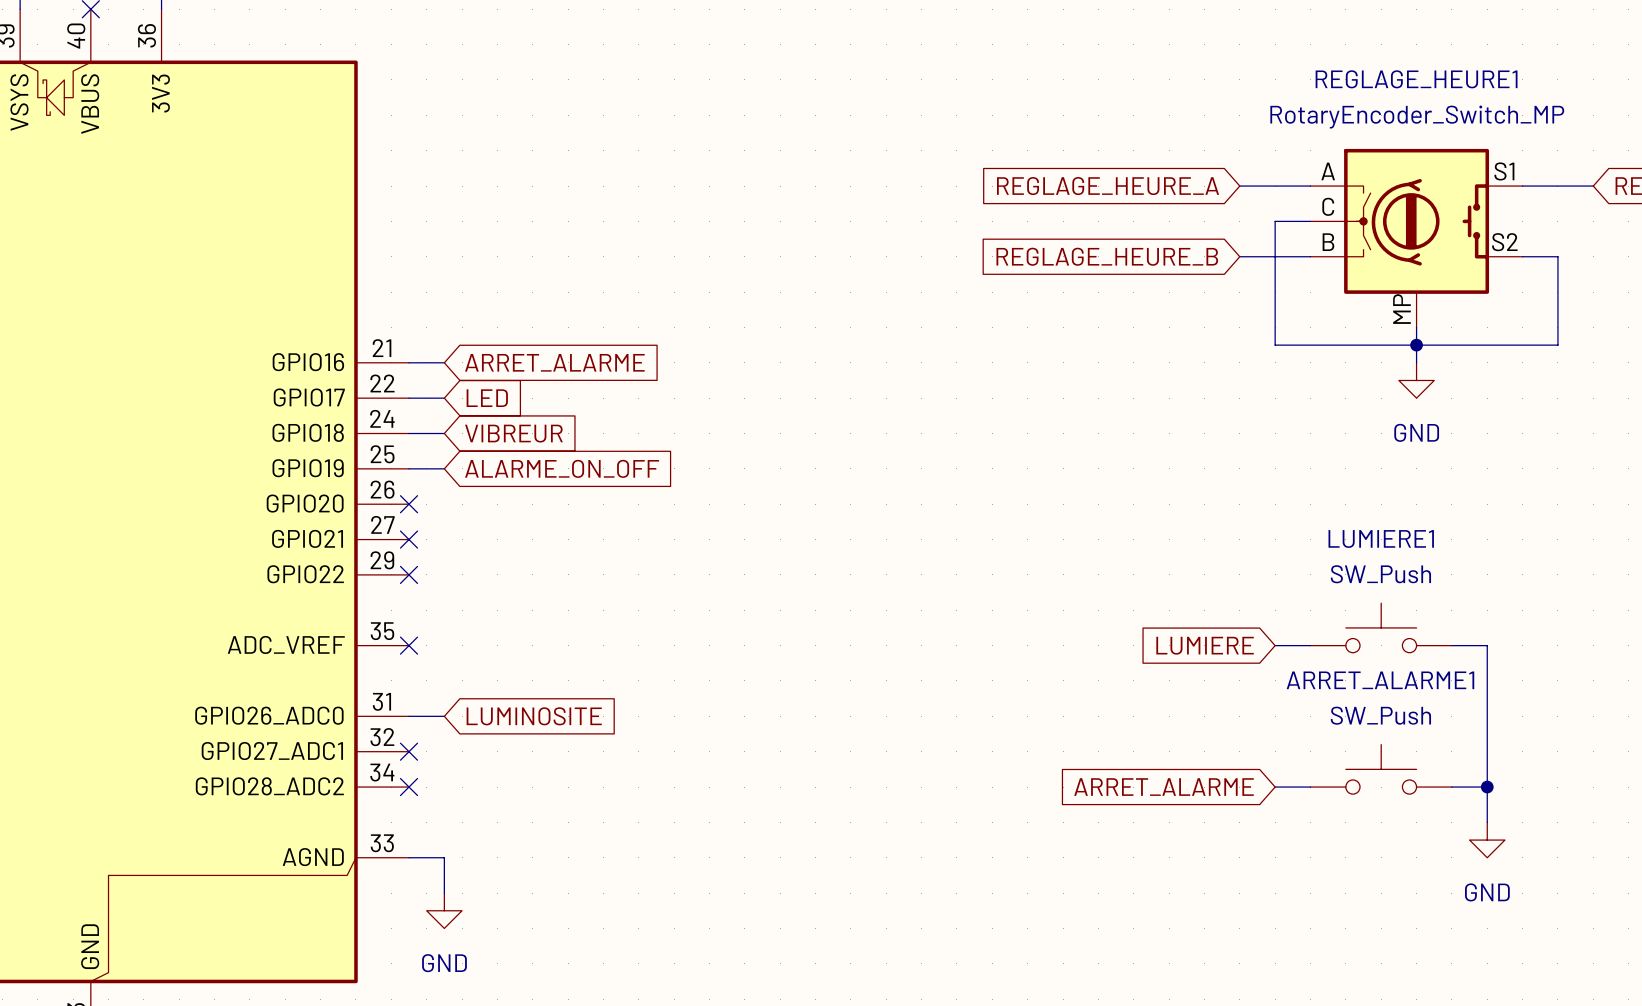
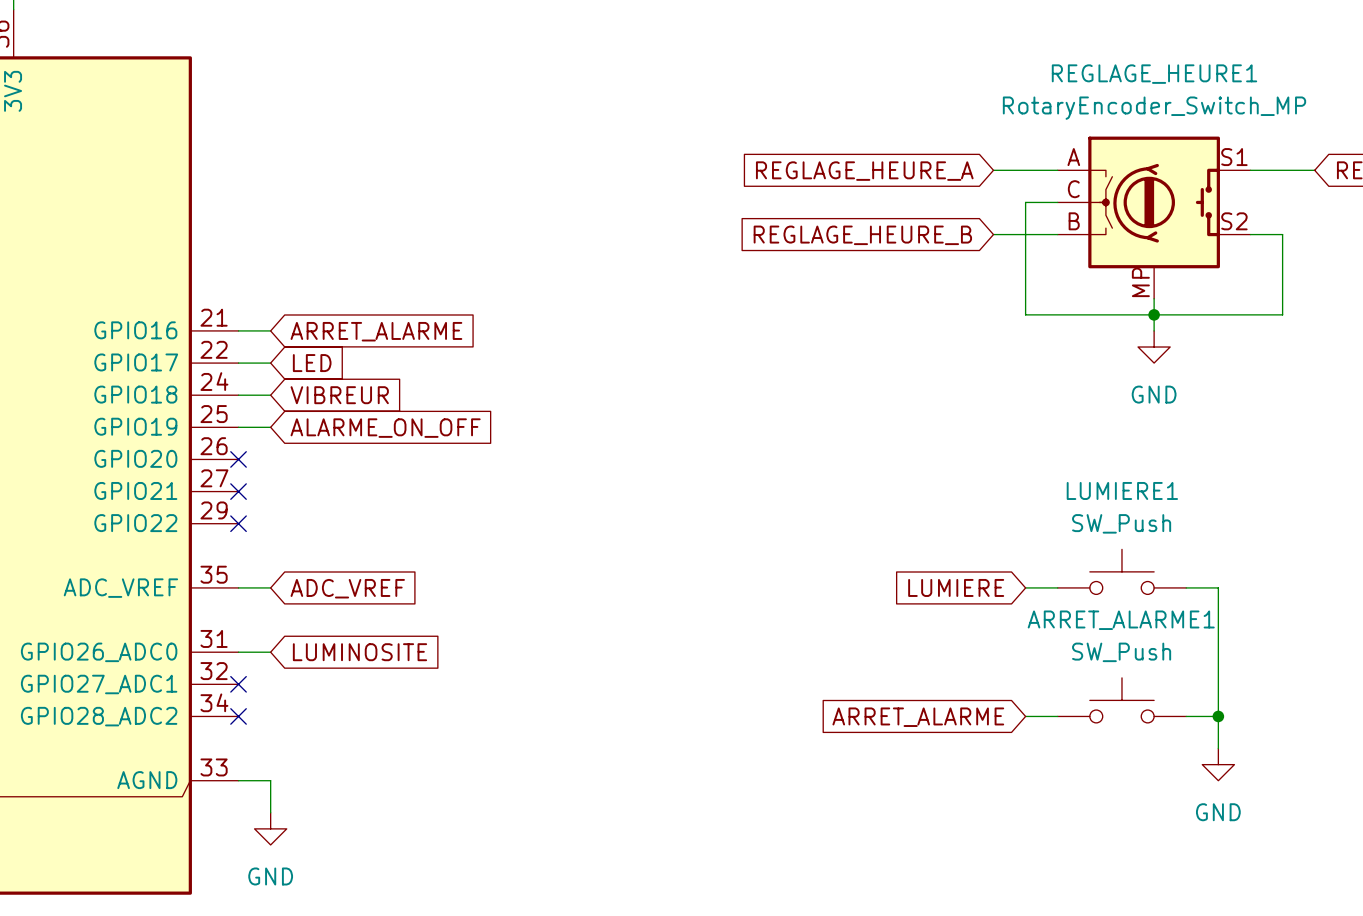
wire: none -> (238, 587) (270, 587)
no-connect mark: (409, 645) -> none
global label: none -> ADC_VREF (347, 588)

